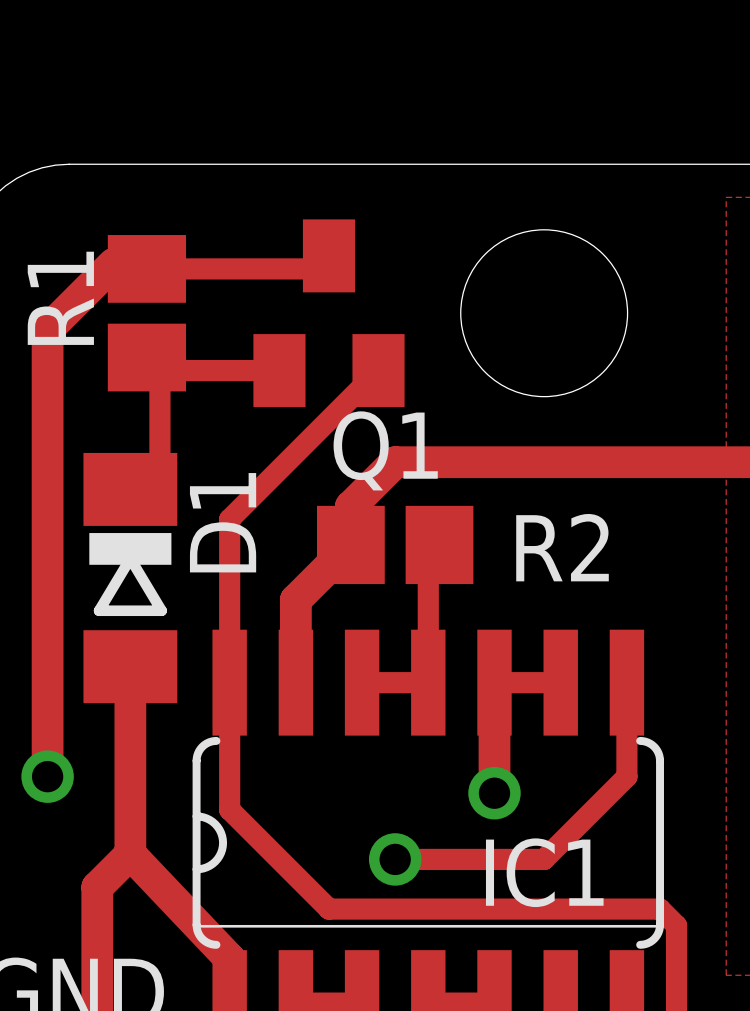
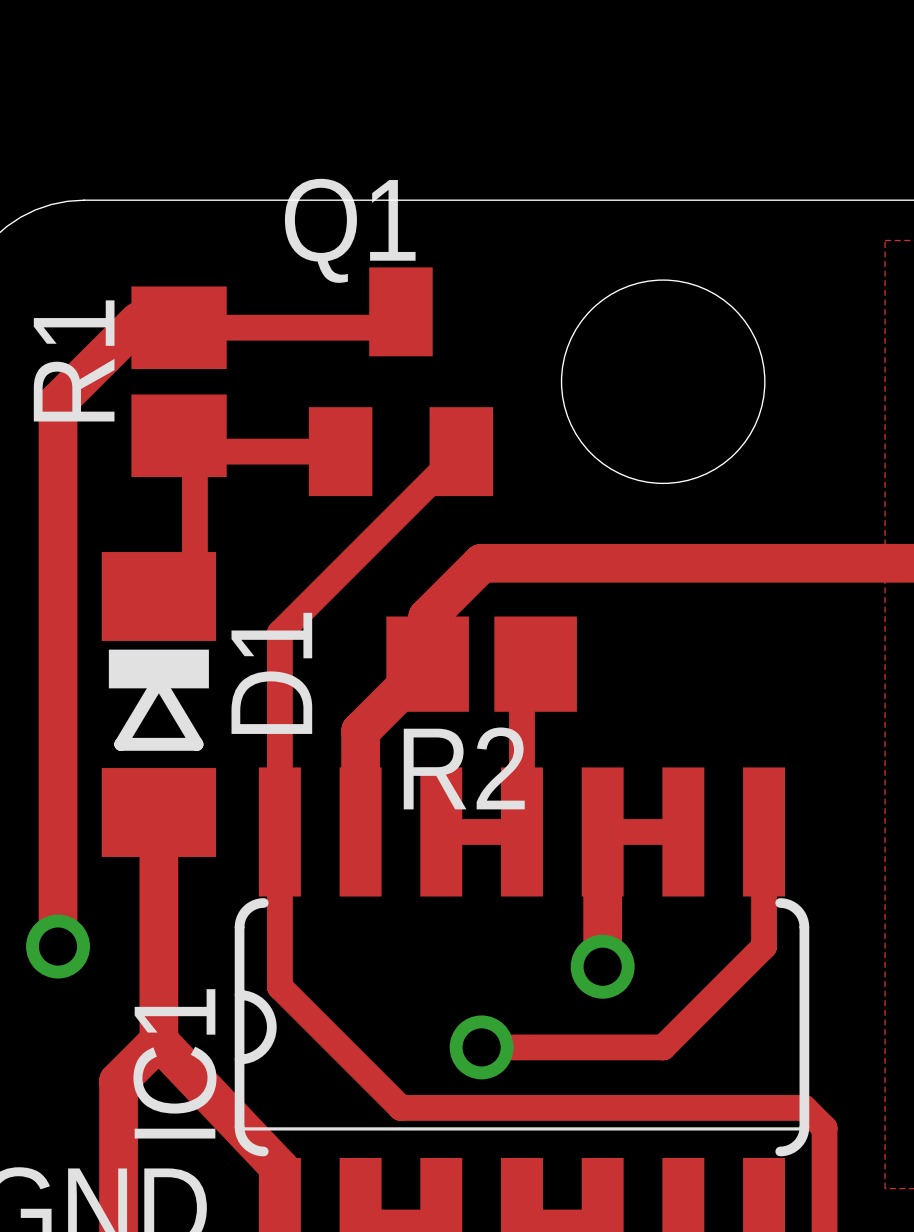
Q1 name position: Q1 (385, 450) -> Q1 (350, 230)
D1 name position: D1 (223, 522) -> D1 (271, 673)
R2 name position: R2 (562, 547) -> R2 (464, 768)
IC1 name rotation: 0° (544, 872) -> 90° counterclockwise (174, 1063)
IC1 name position: IC1 (544, 872) -> IC1 (174, 1063)

